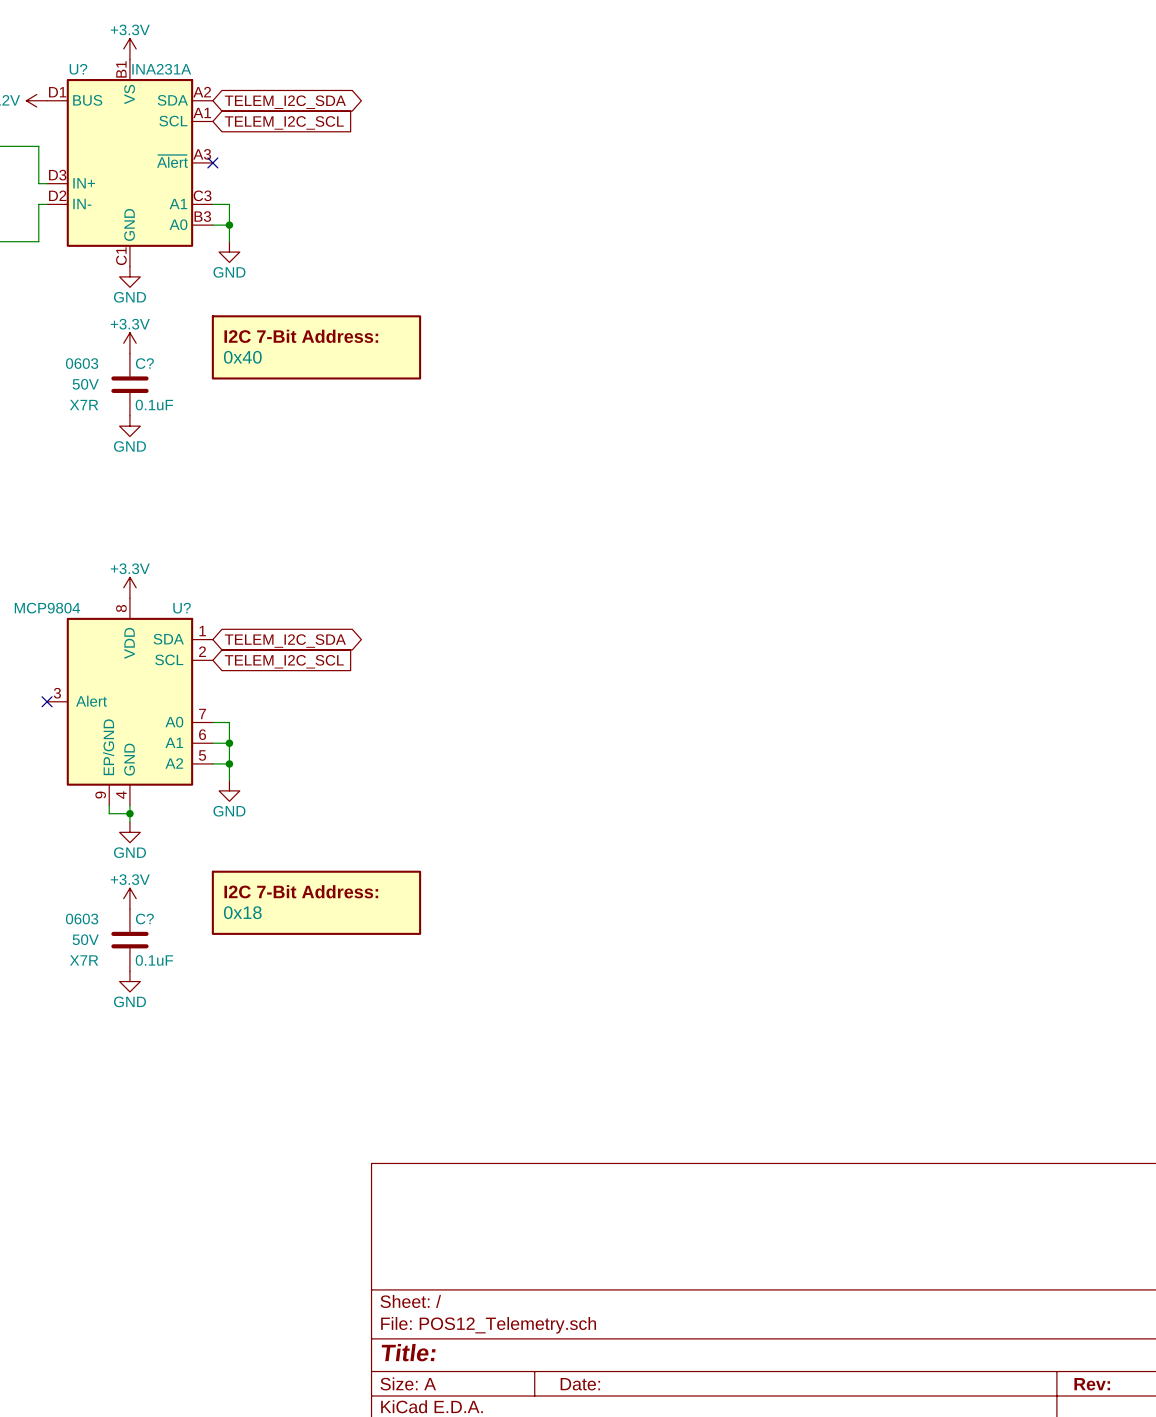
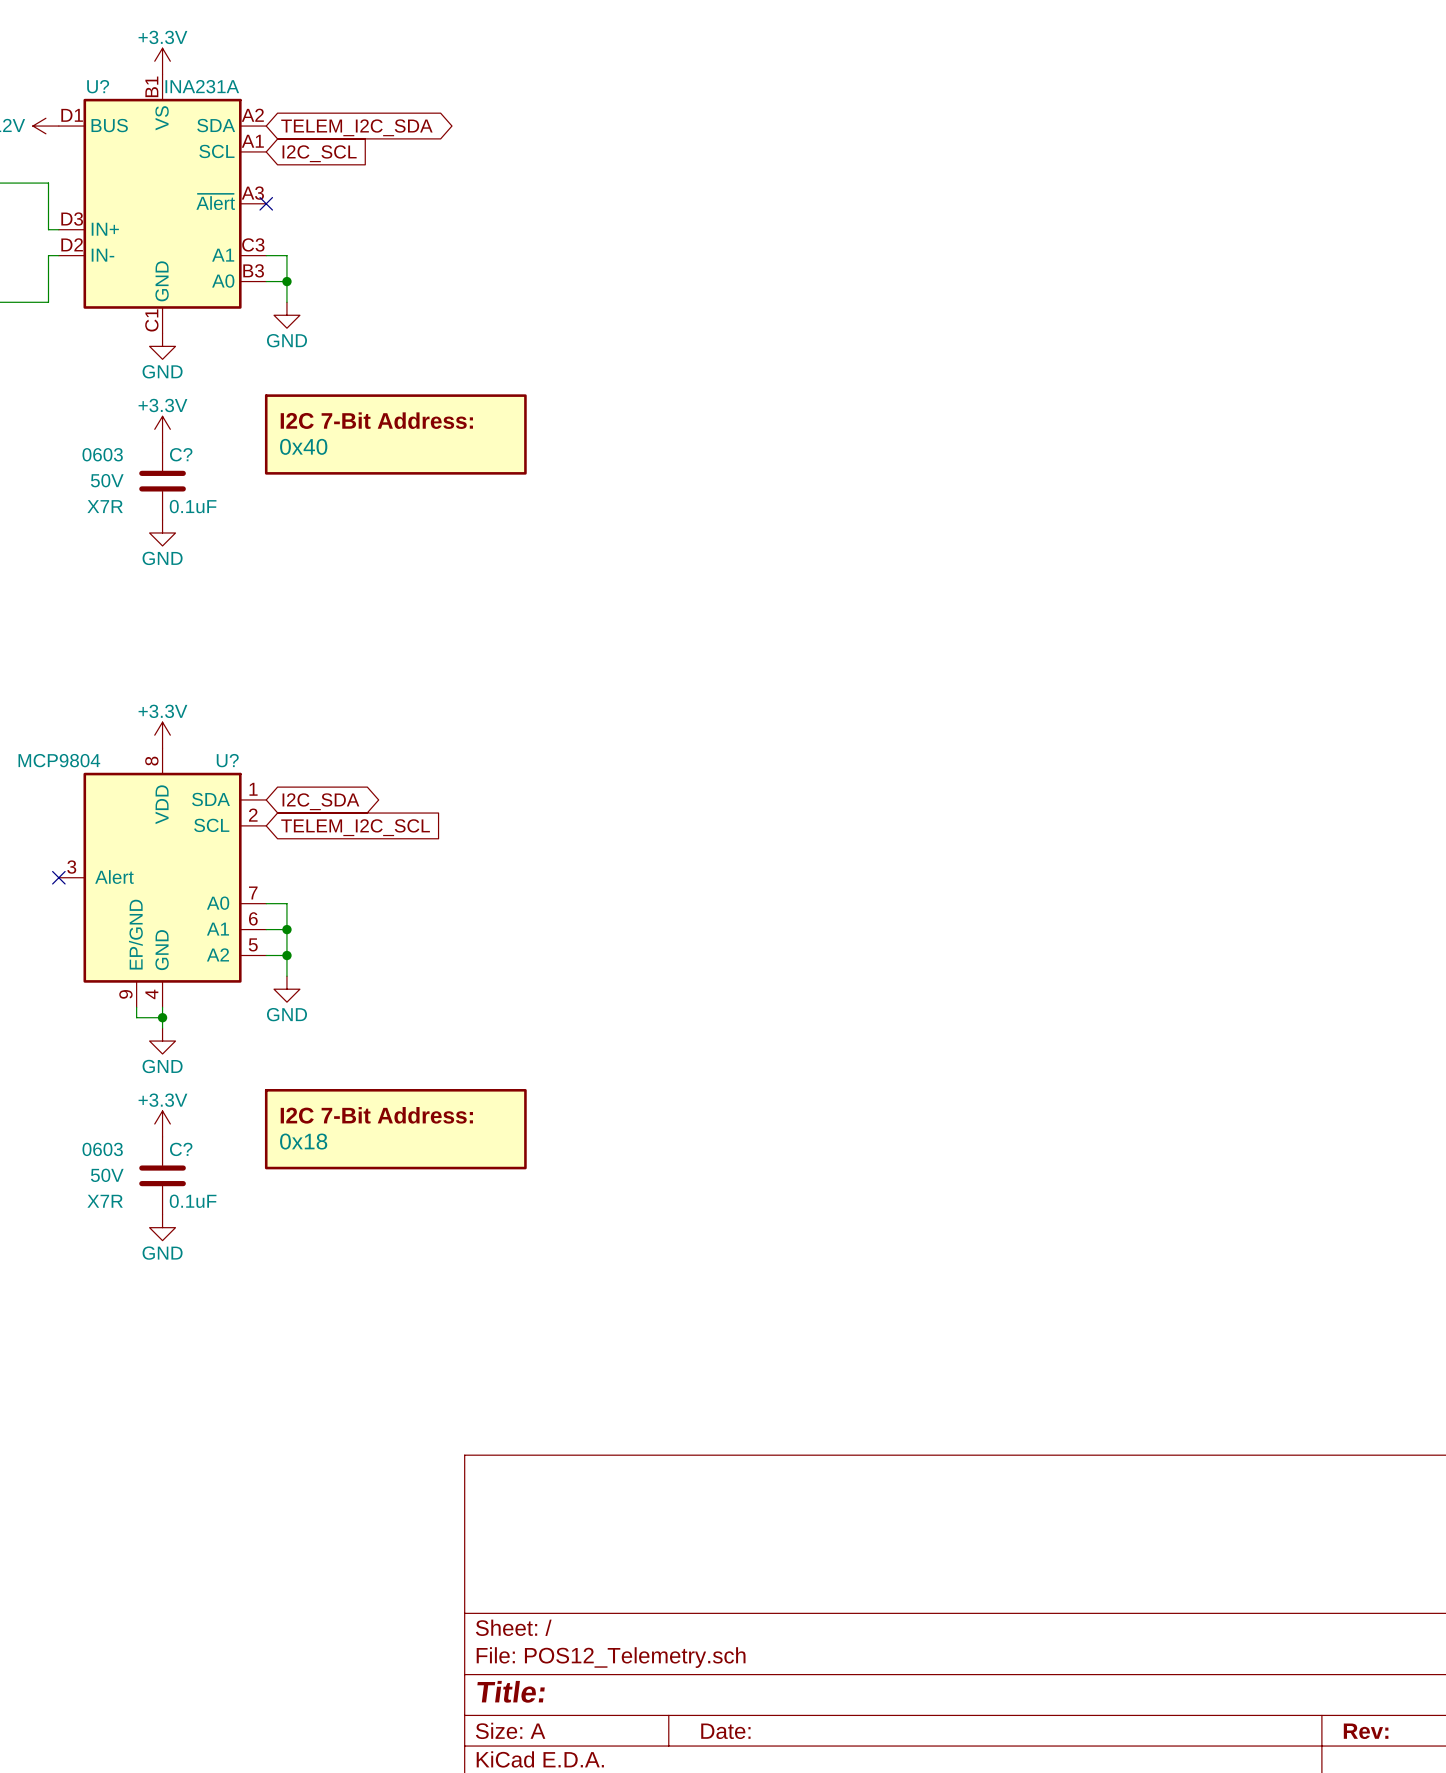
global label: TELEM_I2C_SCL (284, 122) -> I2C_SCL (319, 153)
global label: TELEM_I2C_SDA (285, 641) -> I2C_SDA (320, 801)

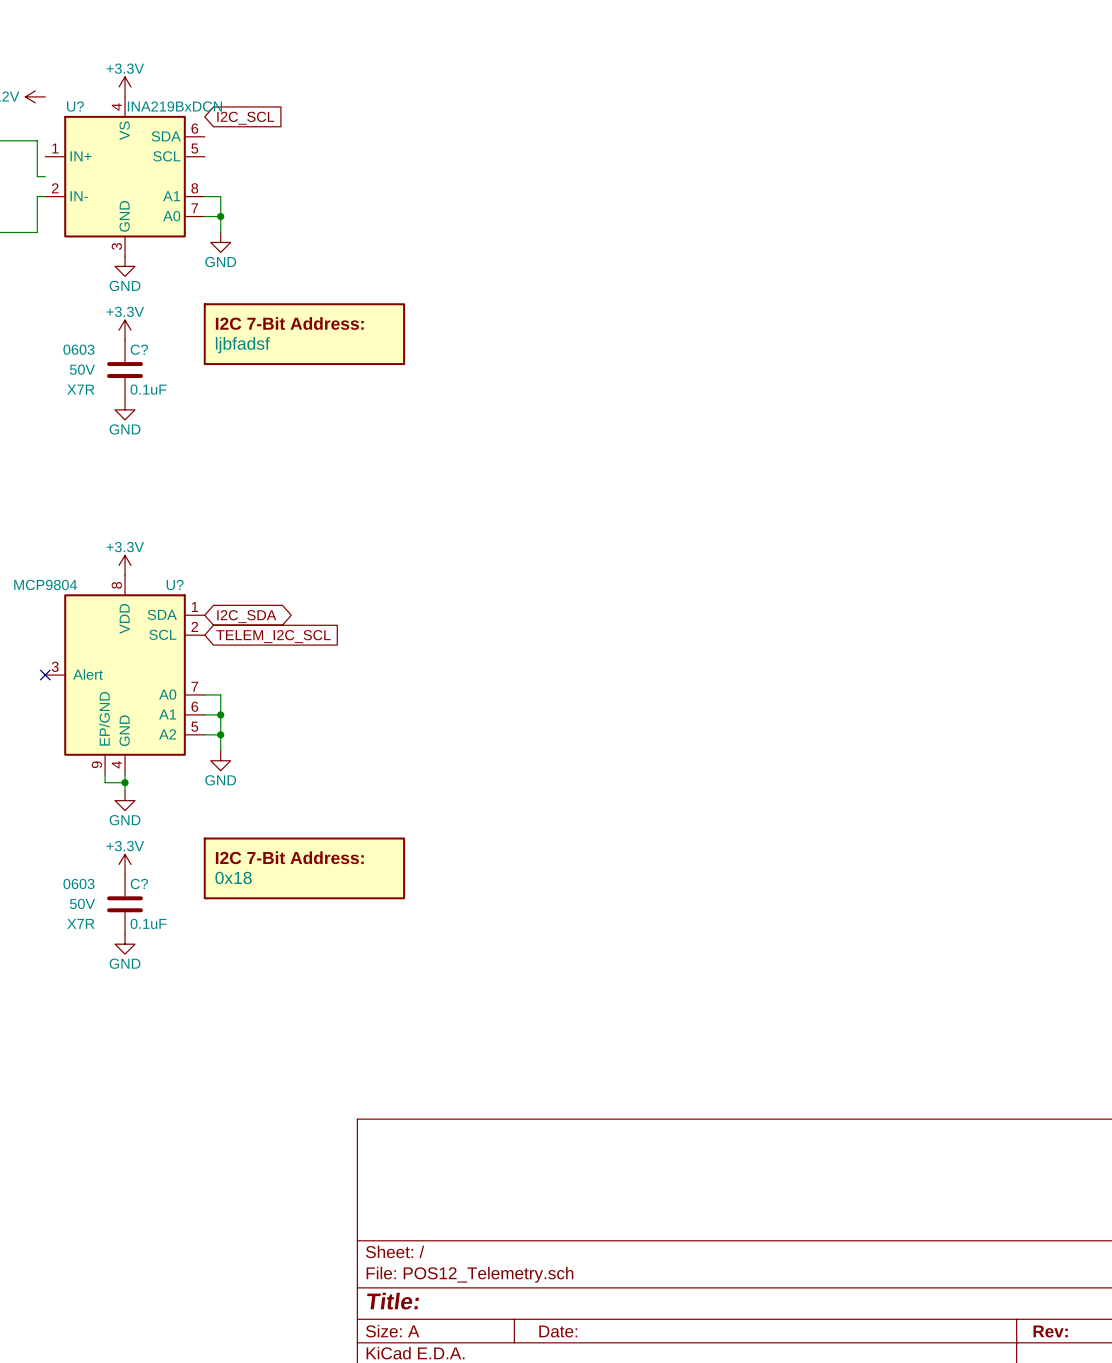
power symbol position: +3.3V (162, 61) -> +3.3V (125, 86)
global label: TELEM_I2C_SDA (356, 127) -> none
U?: INA231A (162, 203) -> none
no-connect mark: (266, 203) -> none
U?: none -> INA219BxDCN (125, 176)
part value: 0x40 (303, 446) -> ljbfadsf (242, 345)

